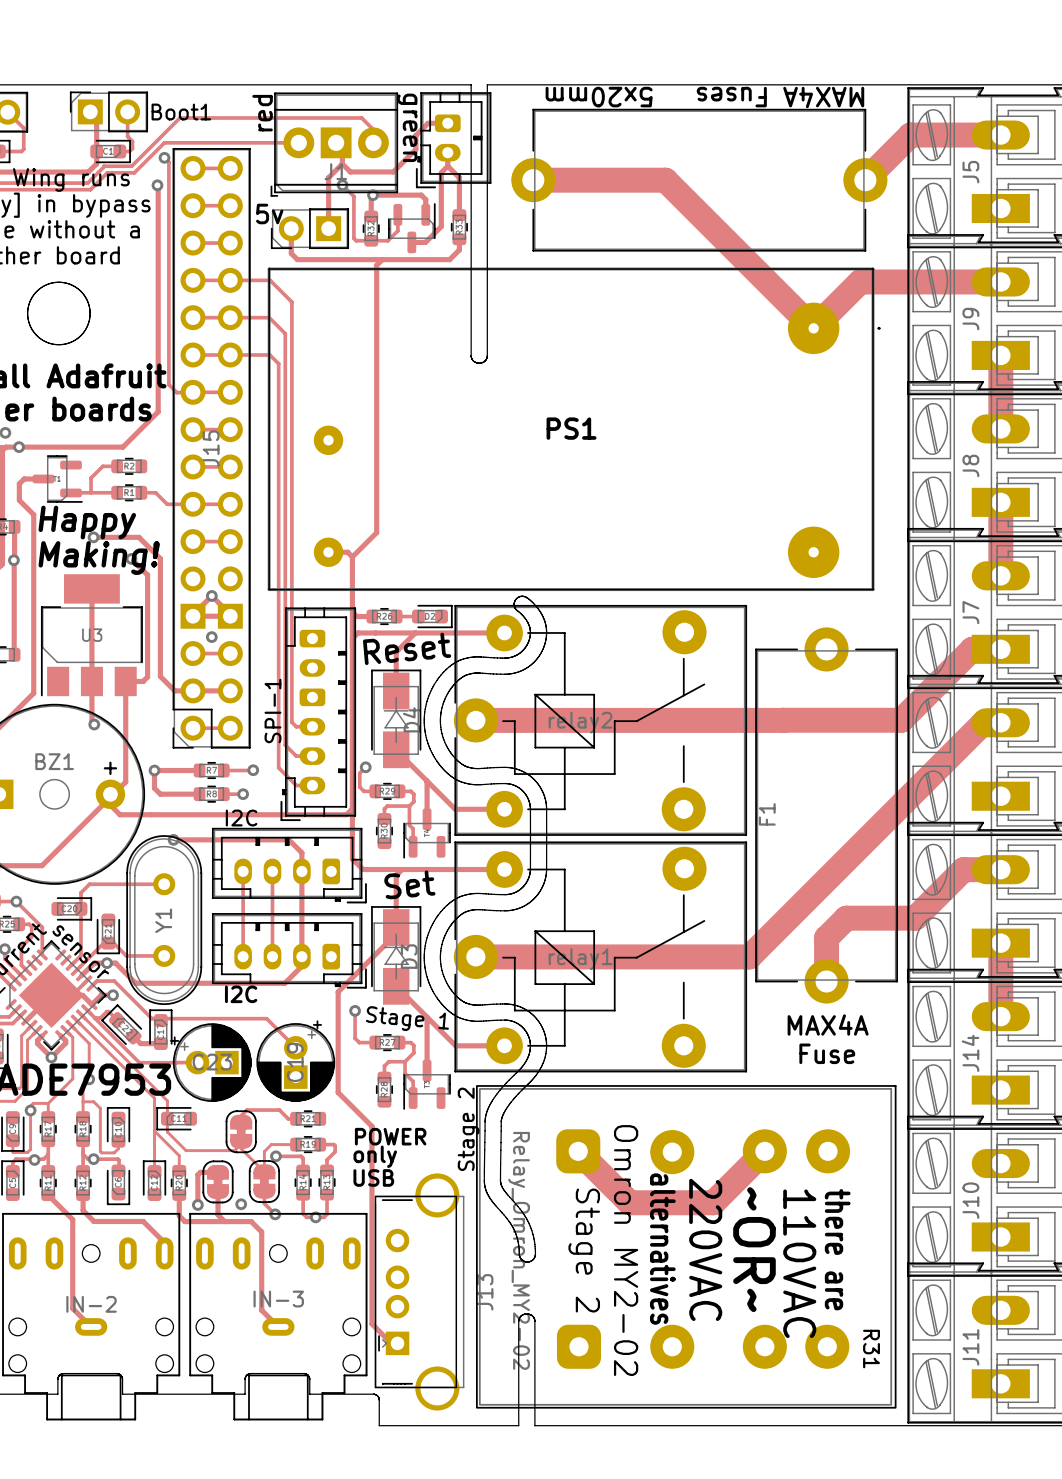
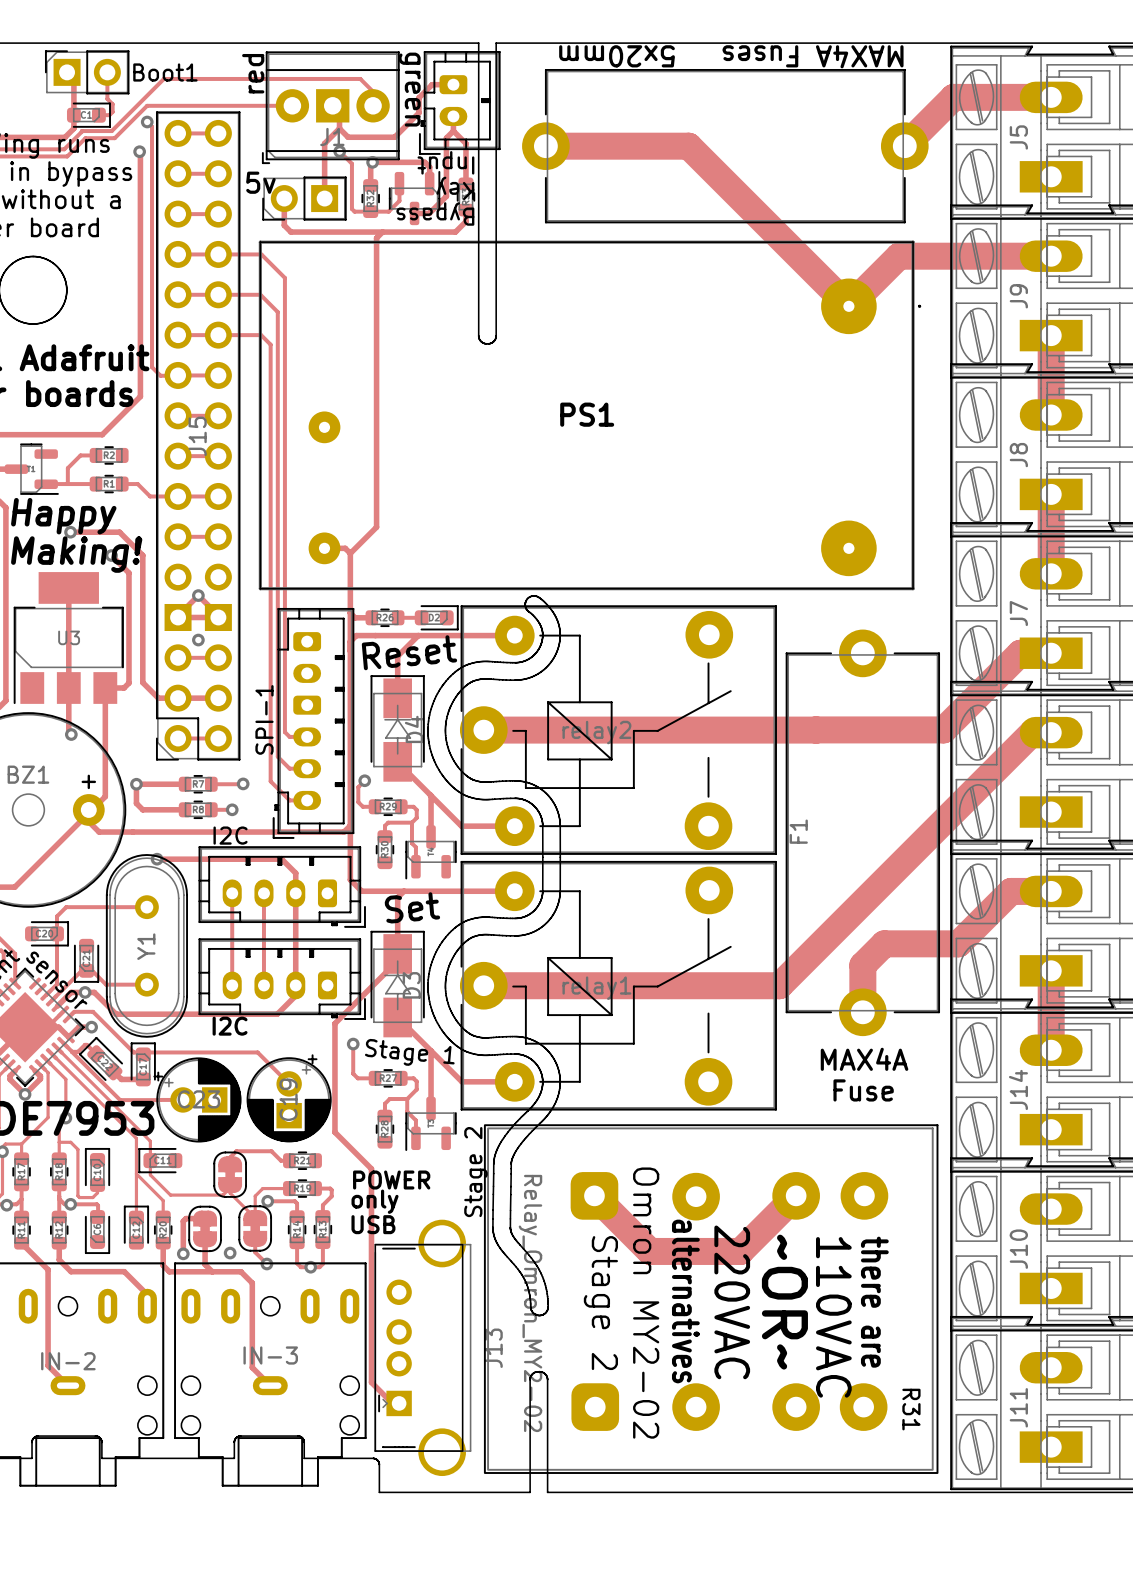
text: none -> Input (445, 162)
text: none -> Key (455, 188)
text: none -> Bypass (435, 213)

